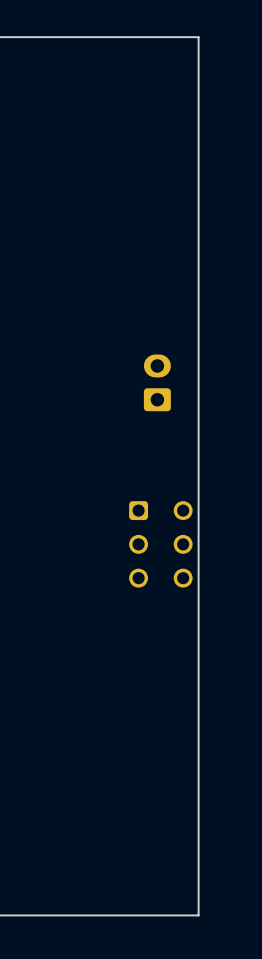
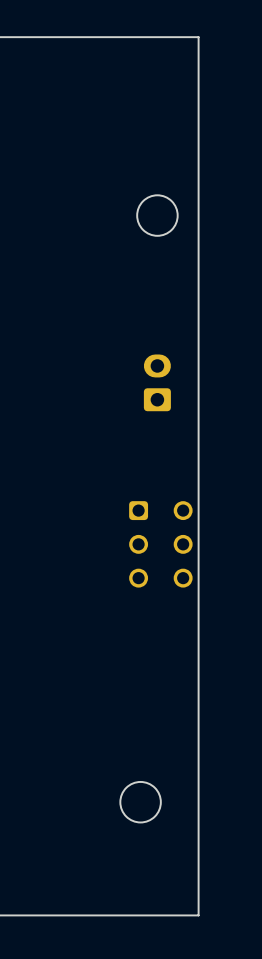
round board edge: none -> [136, 194, 179, 237]
round board edge: none -> [119, 781, 162, 824]

